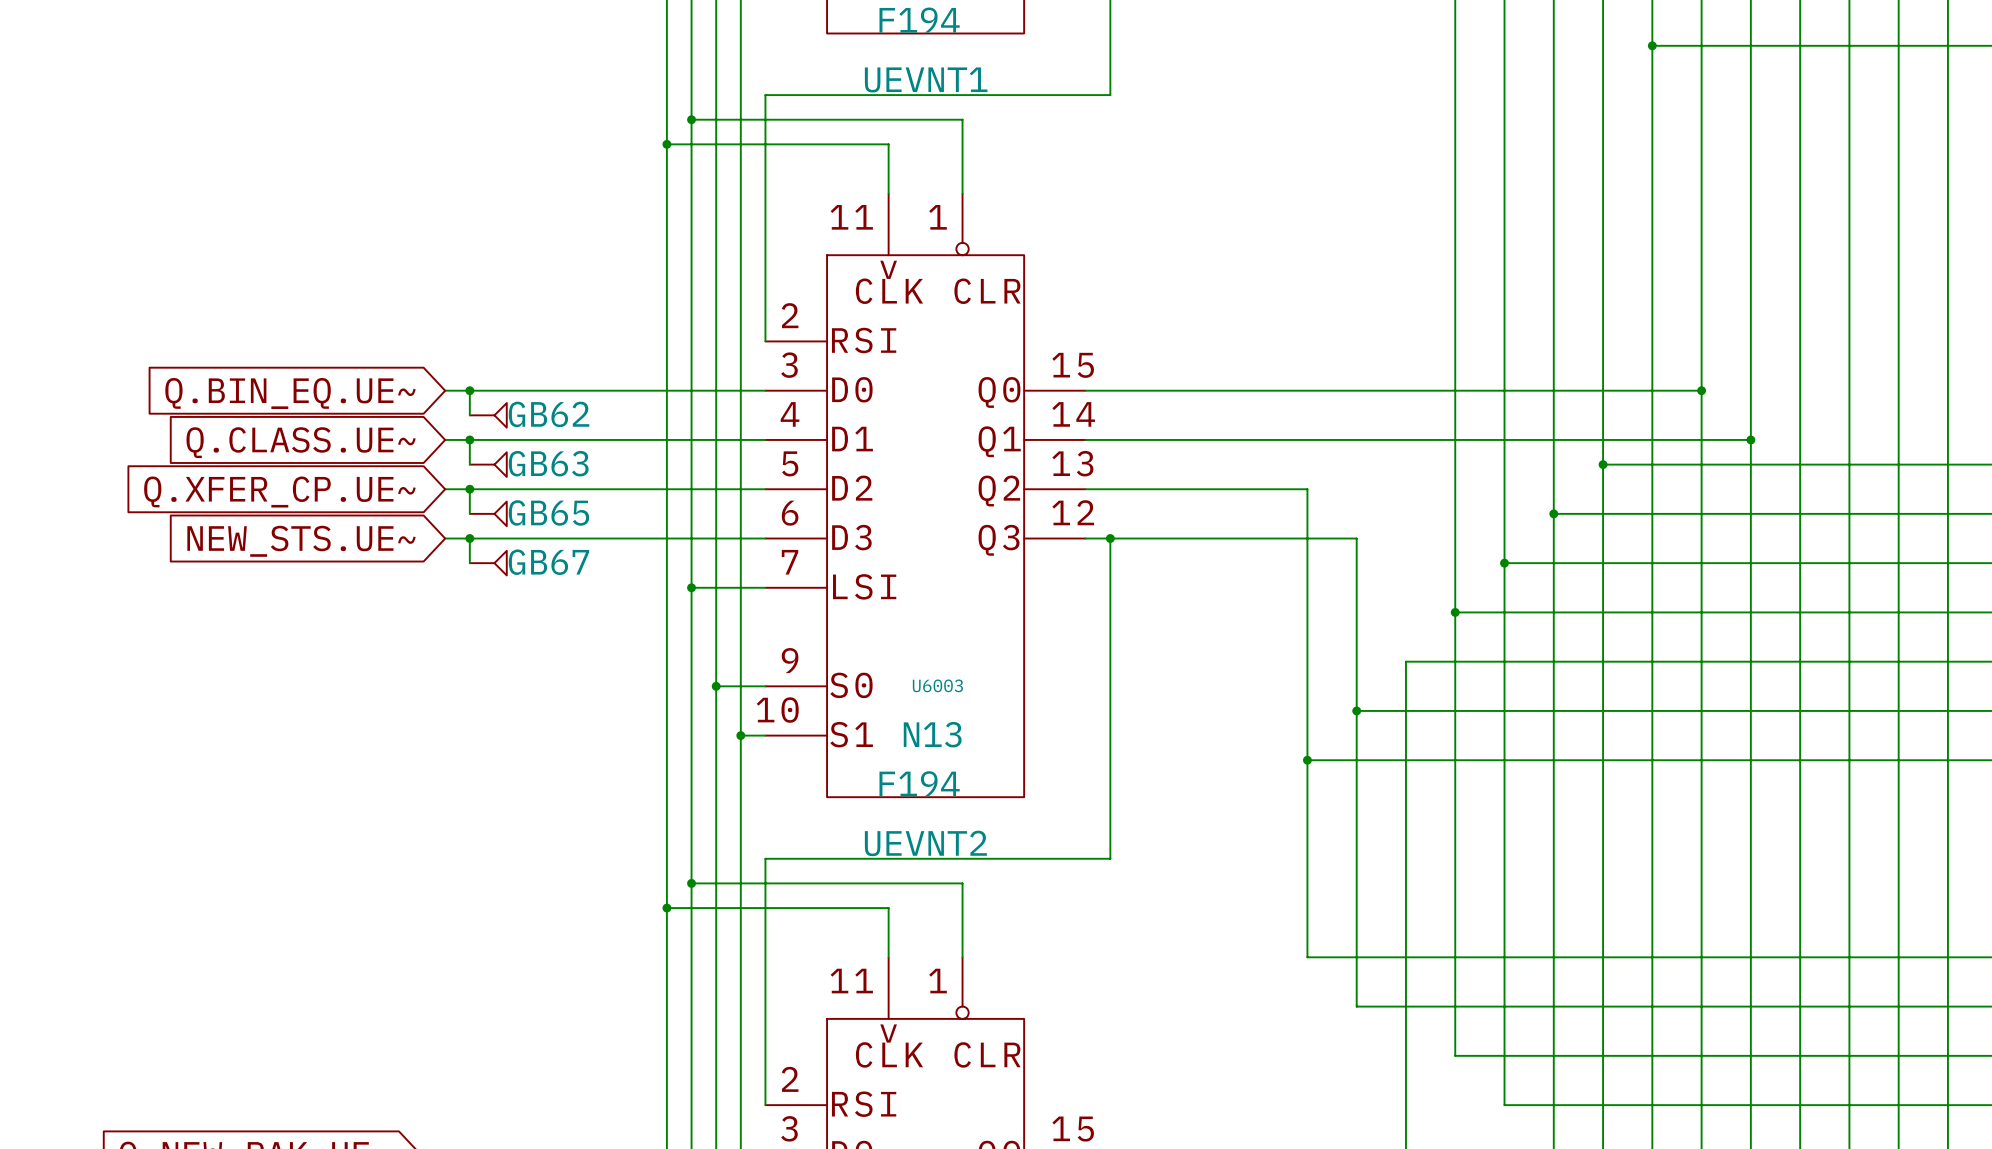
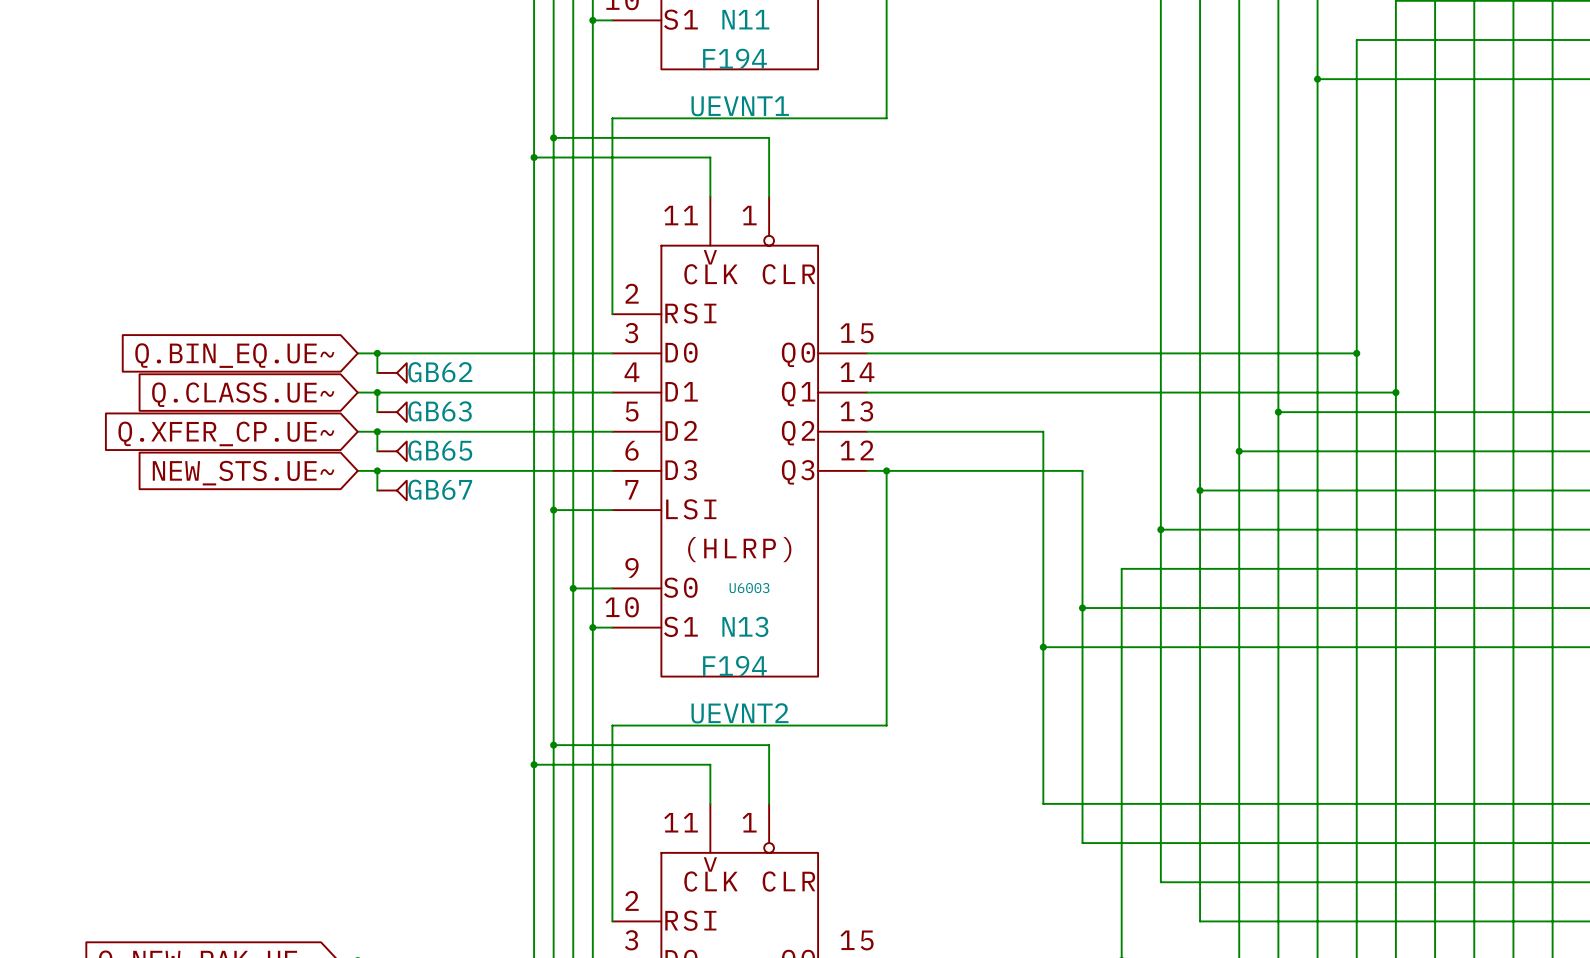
U6003 text: none -> H (710, 548)
U6003 text: none -> L (730, 548)
U6003 text: none -> R (750, 548)
U6003 text: none -> P (769, 548)
U6003 text: none -> ( (692, 549)
U6003 text: none -> ) (787, 549)

